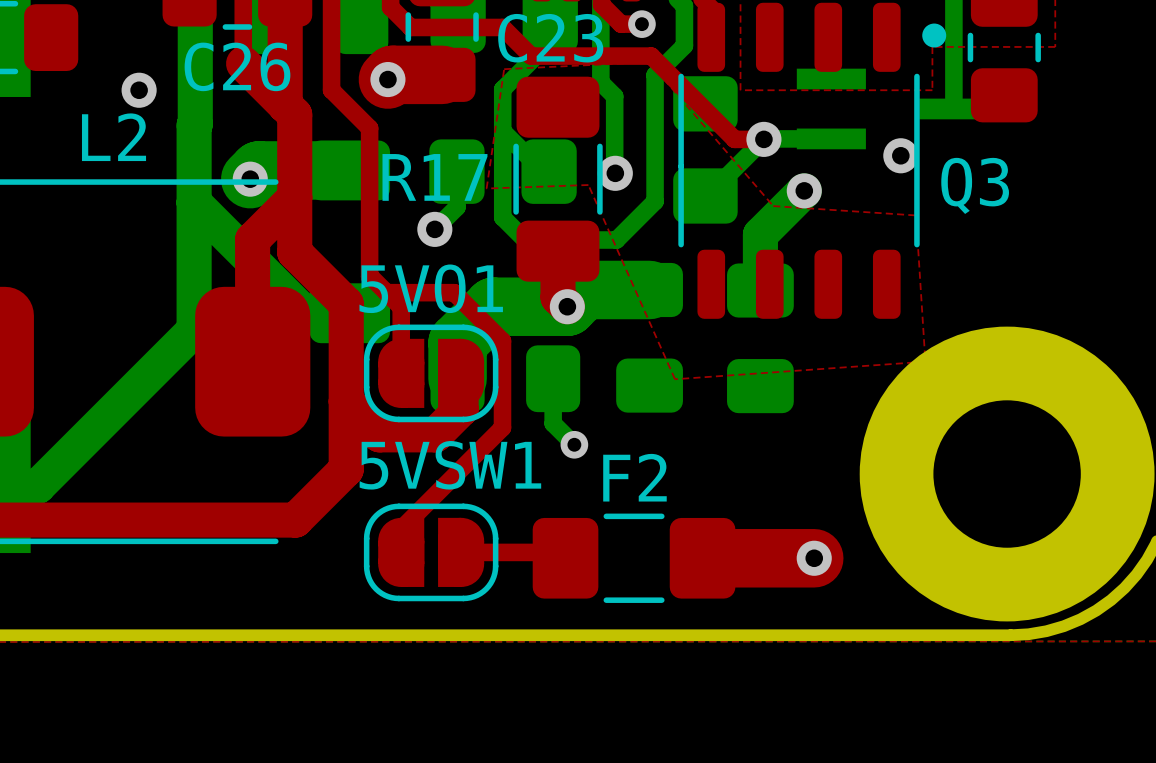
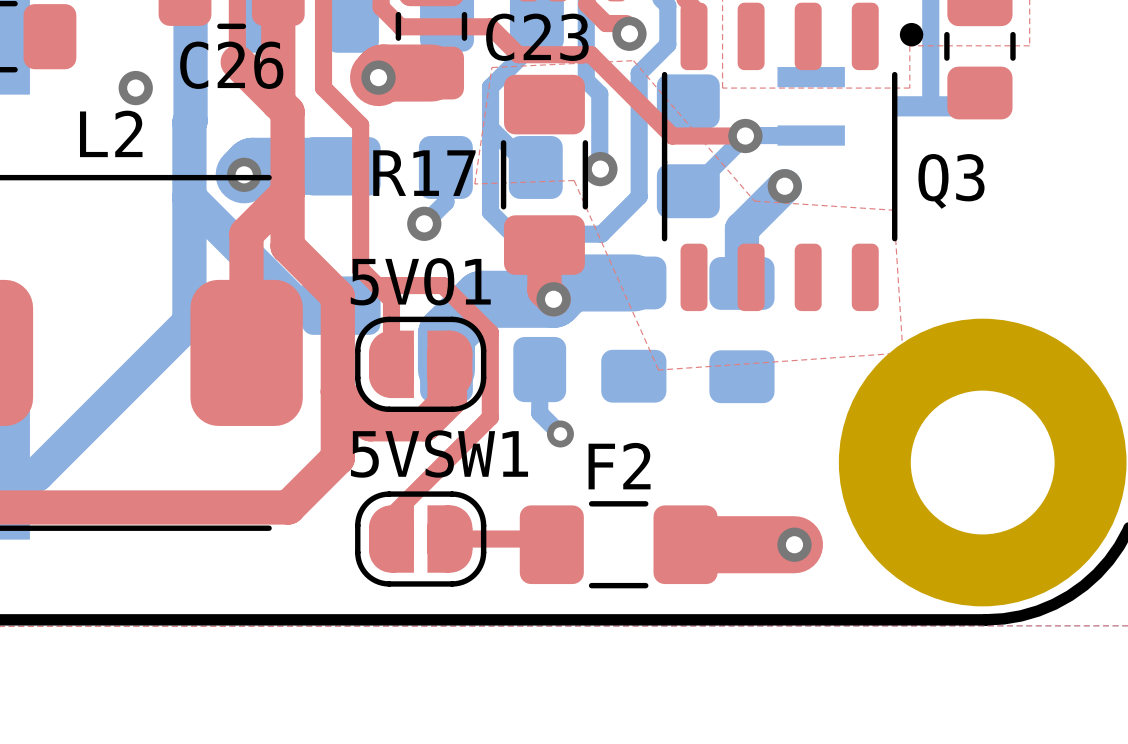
via size: [628, 10, 656, 38] -> [612, 16, 647, 51]
top track: (605, 56) (651, 56) (734, 139) -> (591, 54) (672, 136) (716, 136)
via: (900, 155) -> none

